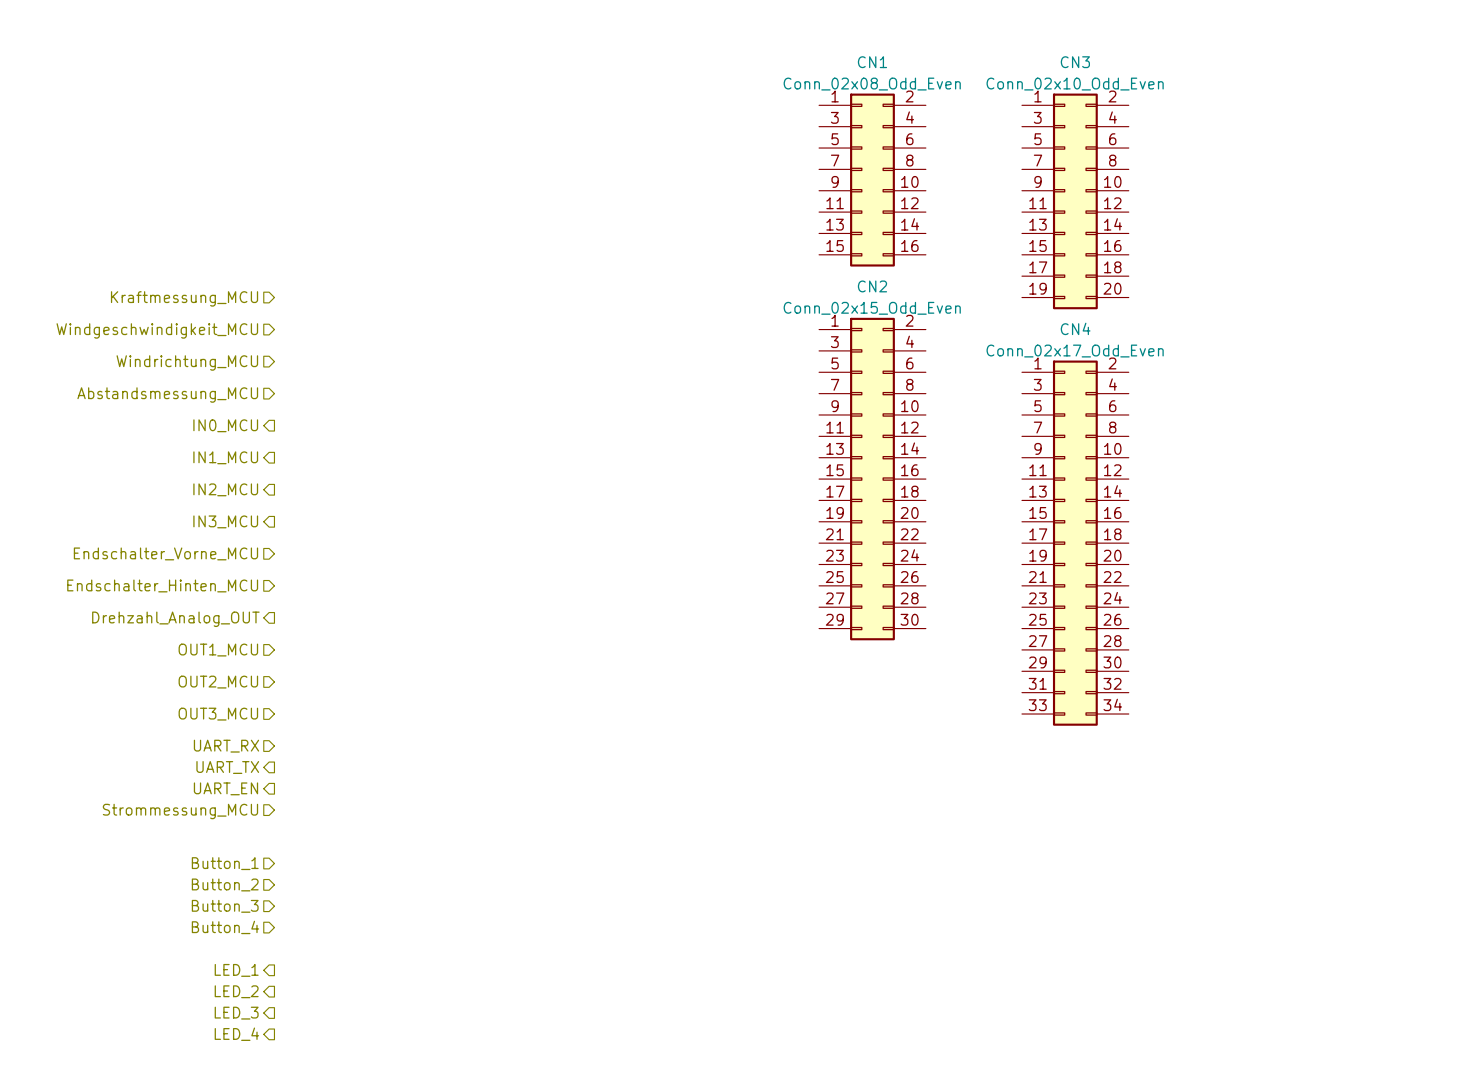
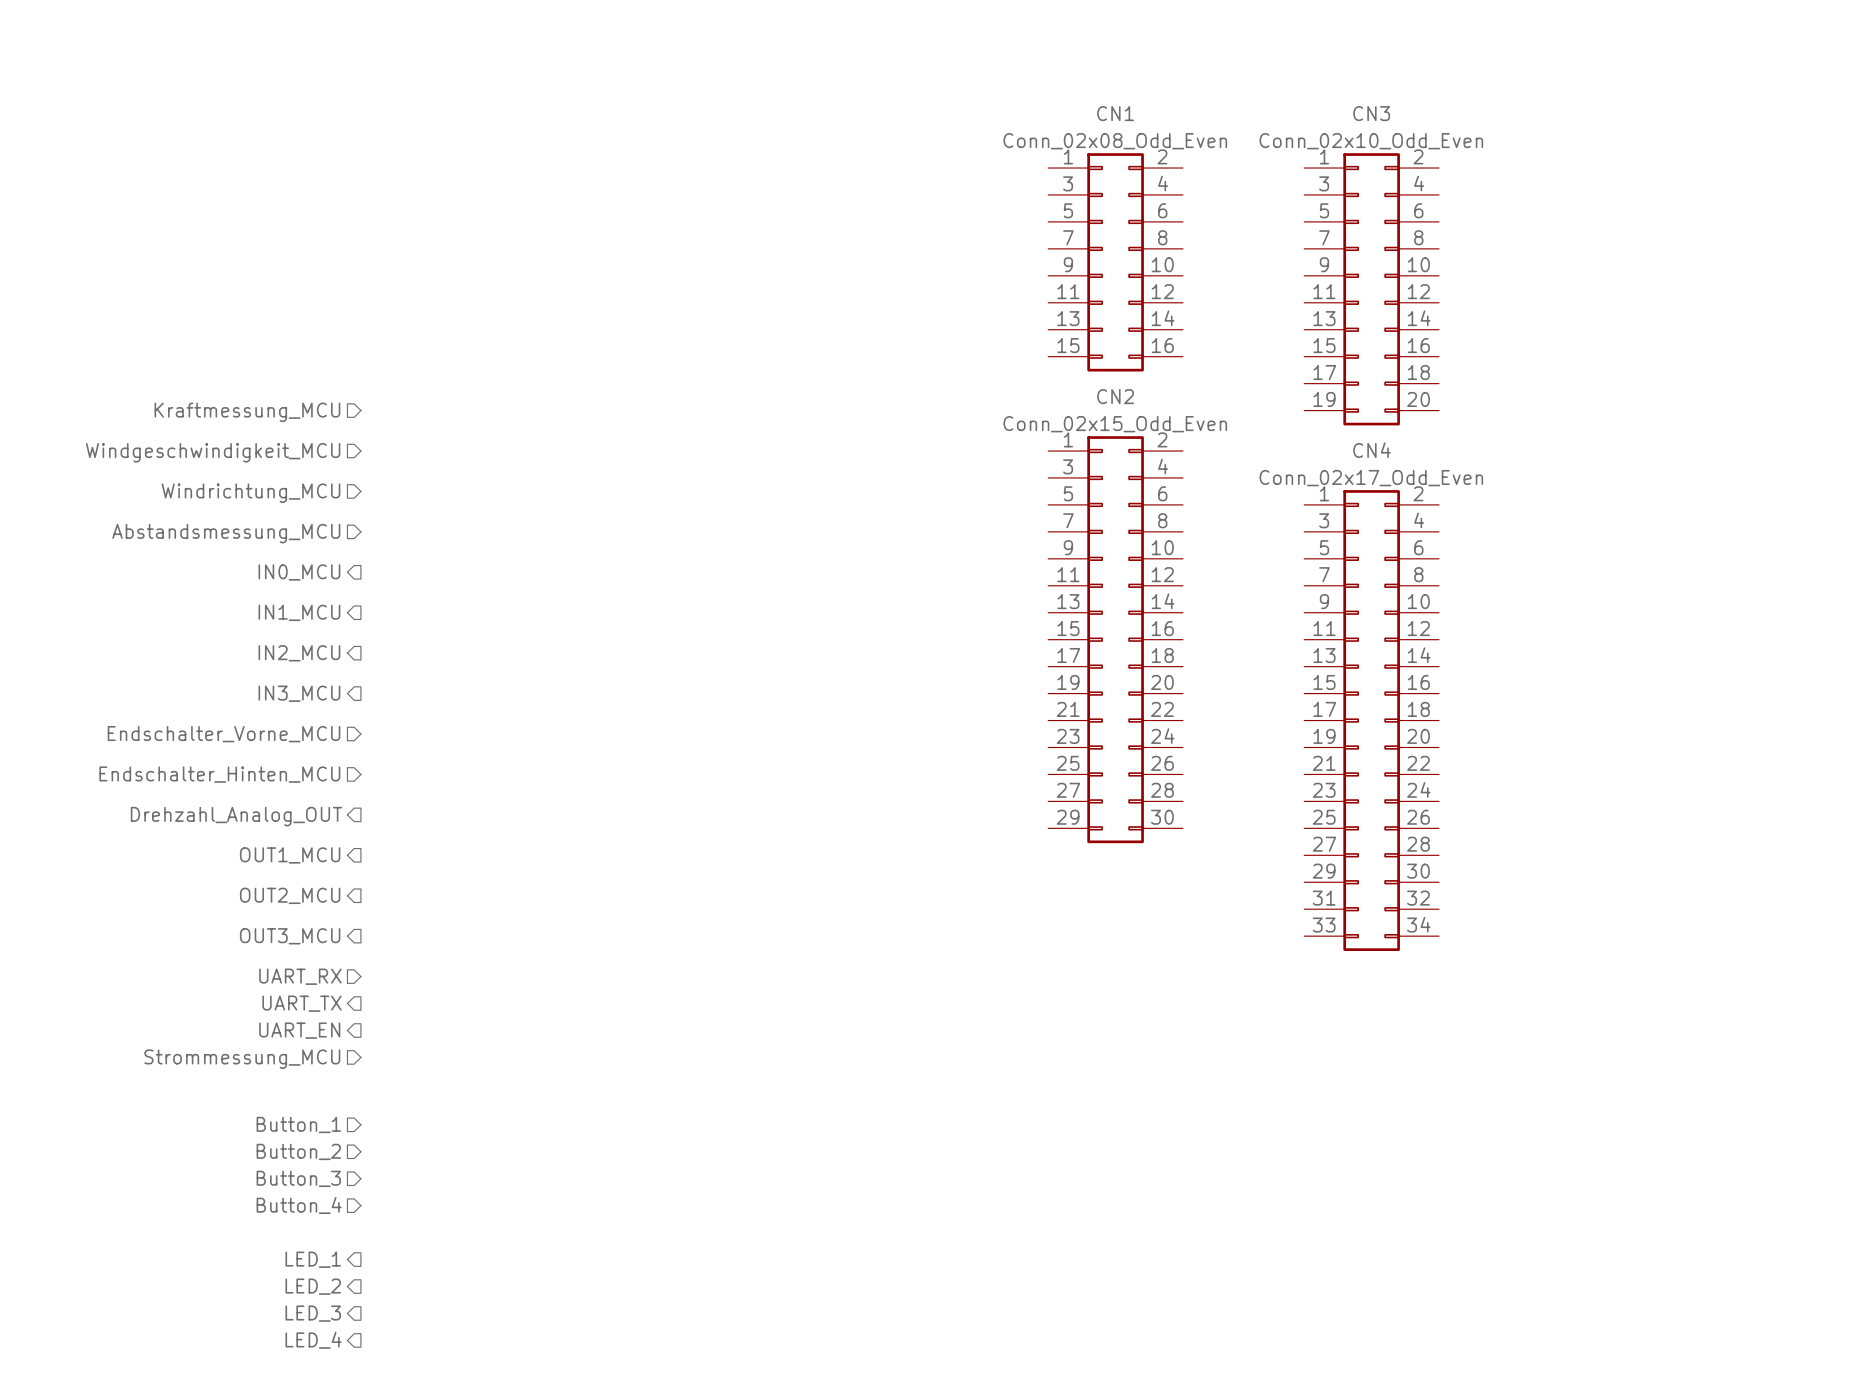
hierarchical label shape: input (218, 650) -> output (290, 855)
hierarchical label shape: input (218, 682) -> output (290, 895)
hierarchical label shape: input (218, 714) -> output (290, 936)

